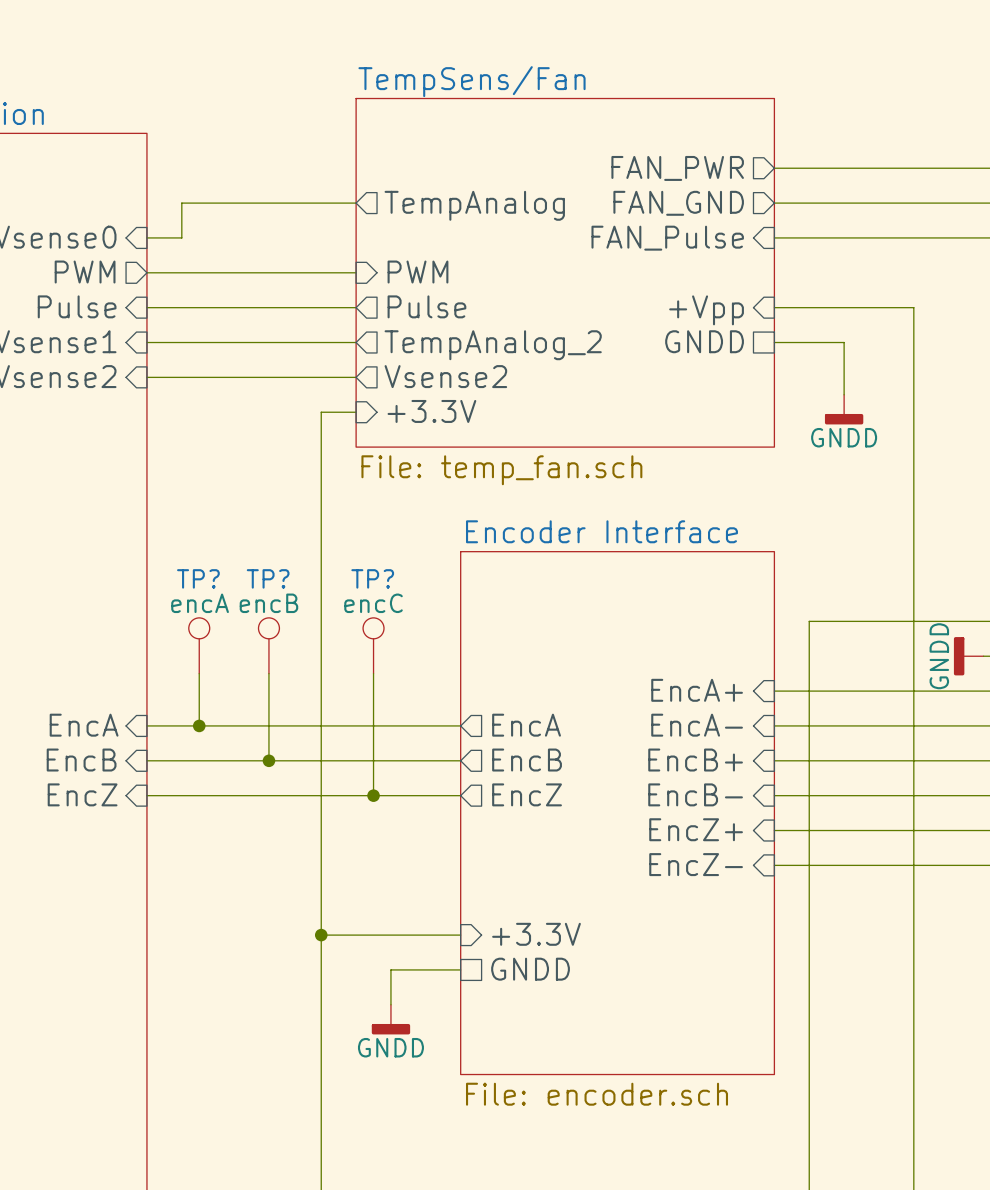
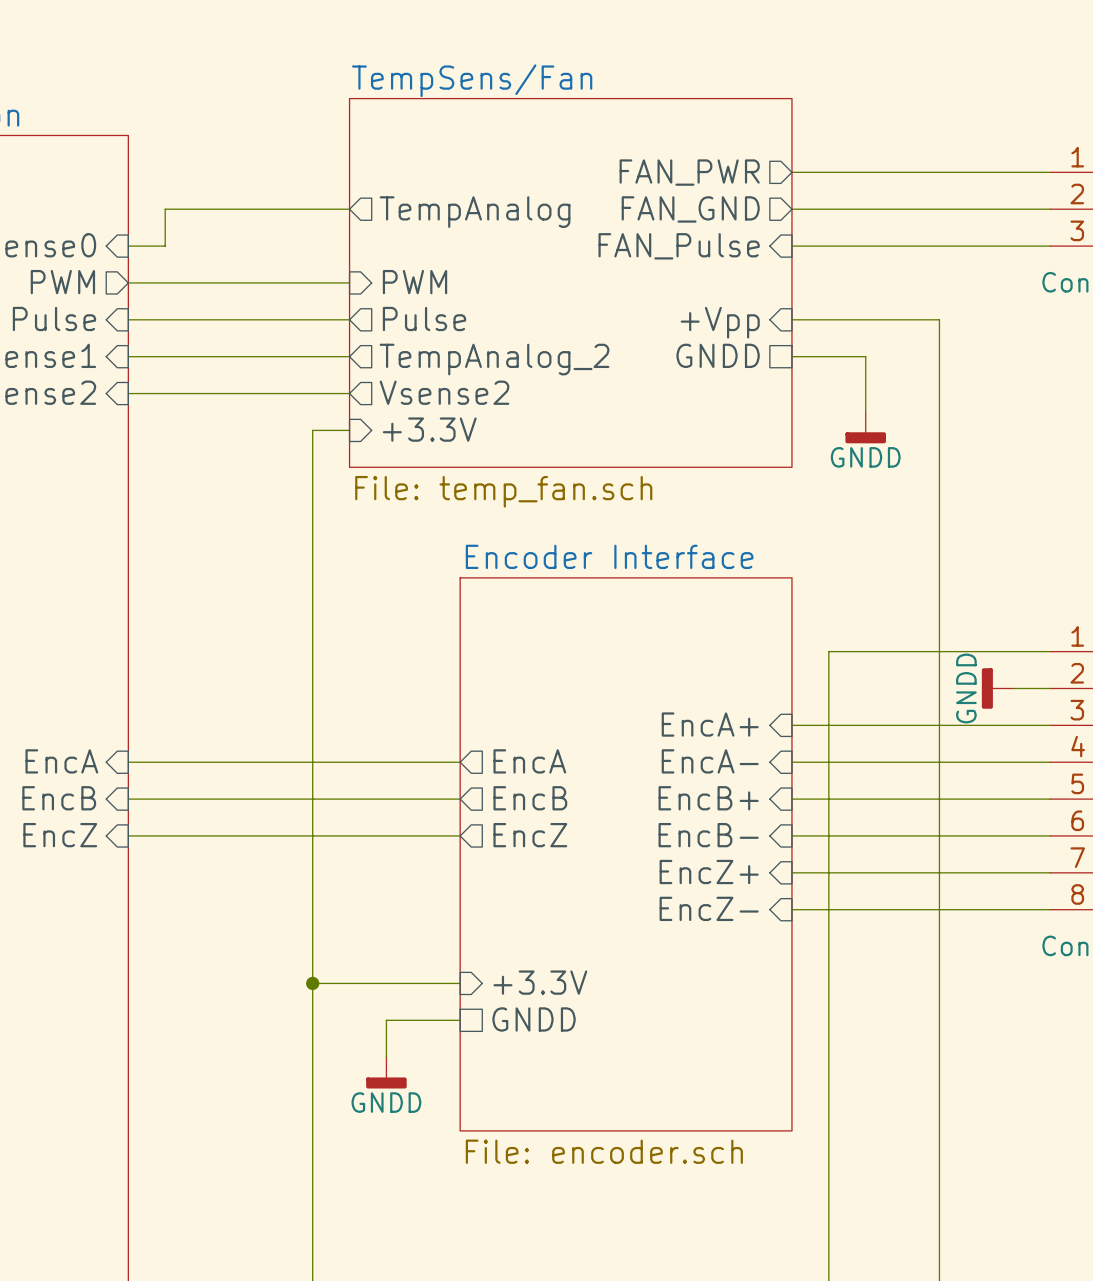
TP?: encA (199, 645) -> none
TP?: encB (268, 645) -> none
TP?: encC (373, 645) -> none
wire: (199, 673) (199, 725) -> none
wire: (268, 673) (268, 760) -> none
wire: (373, 673) (373, 795) -> none
junction: (199, 725) -> none
junction: (268, 760) -> none
junction: (373, 795) -> none

